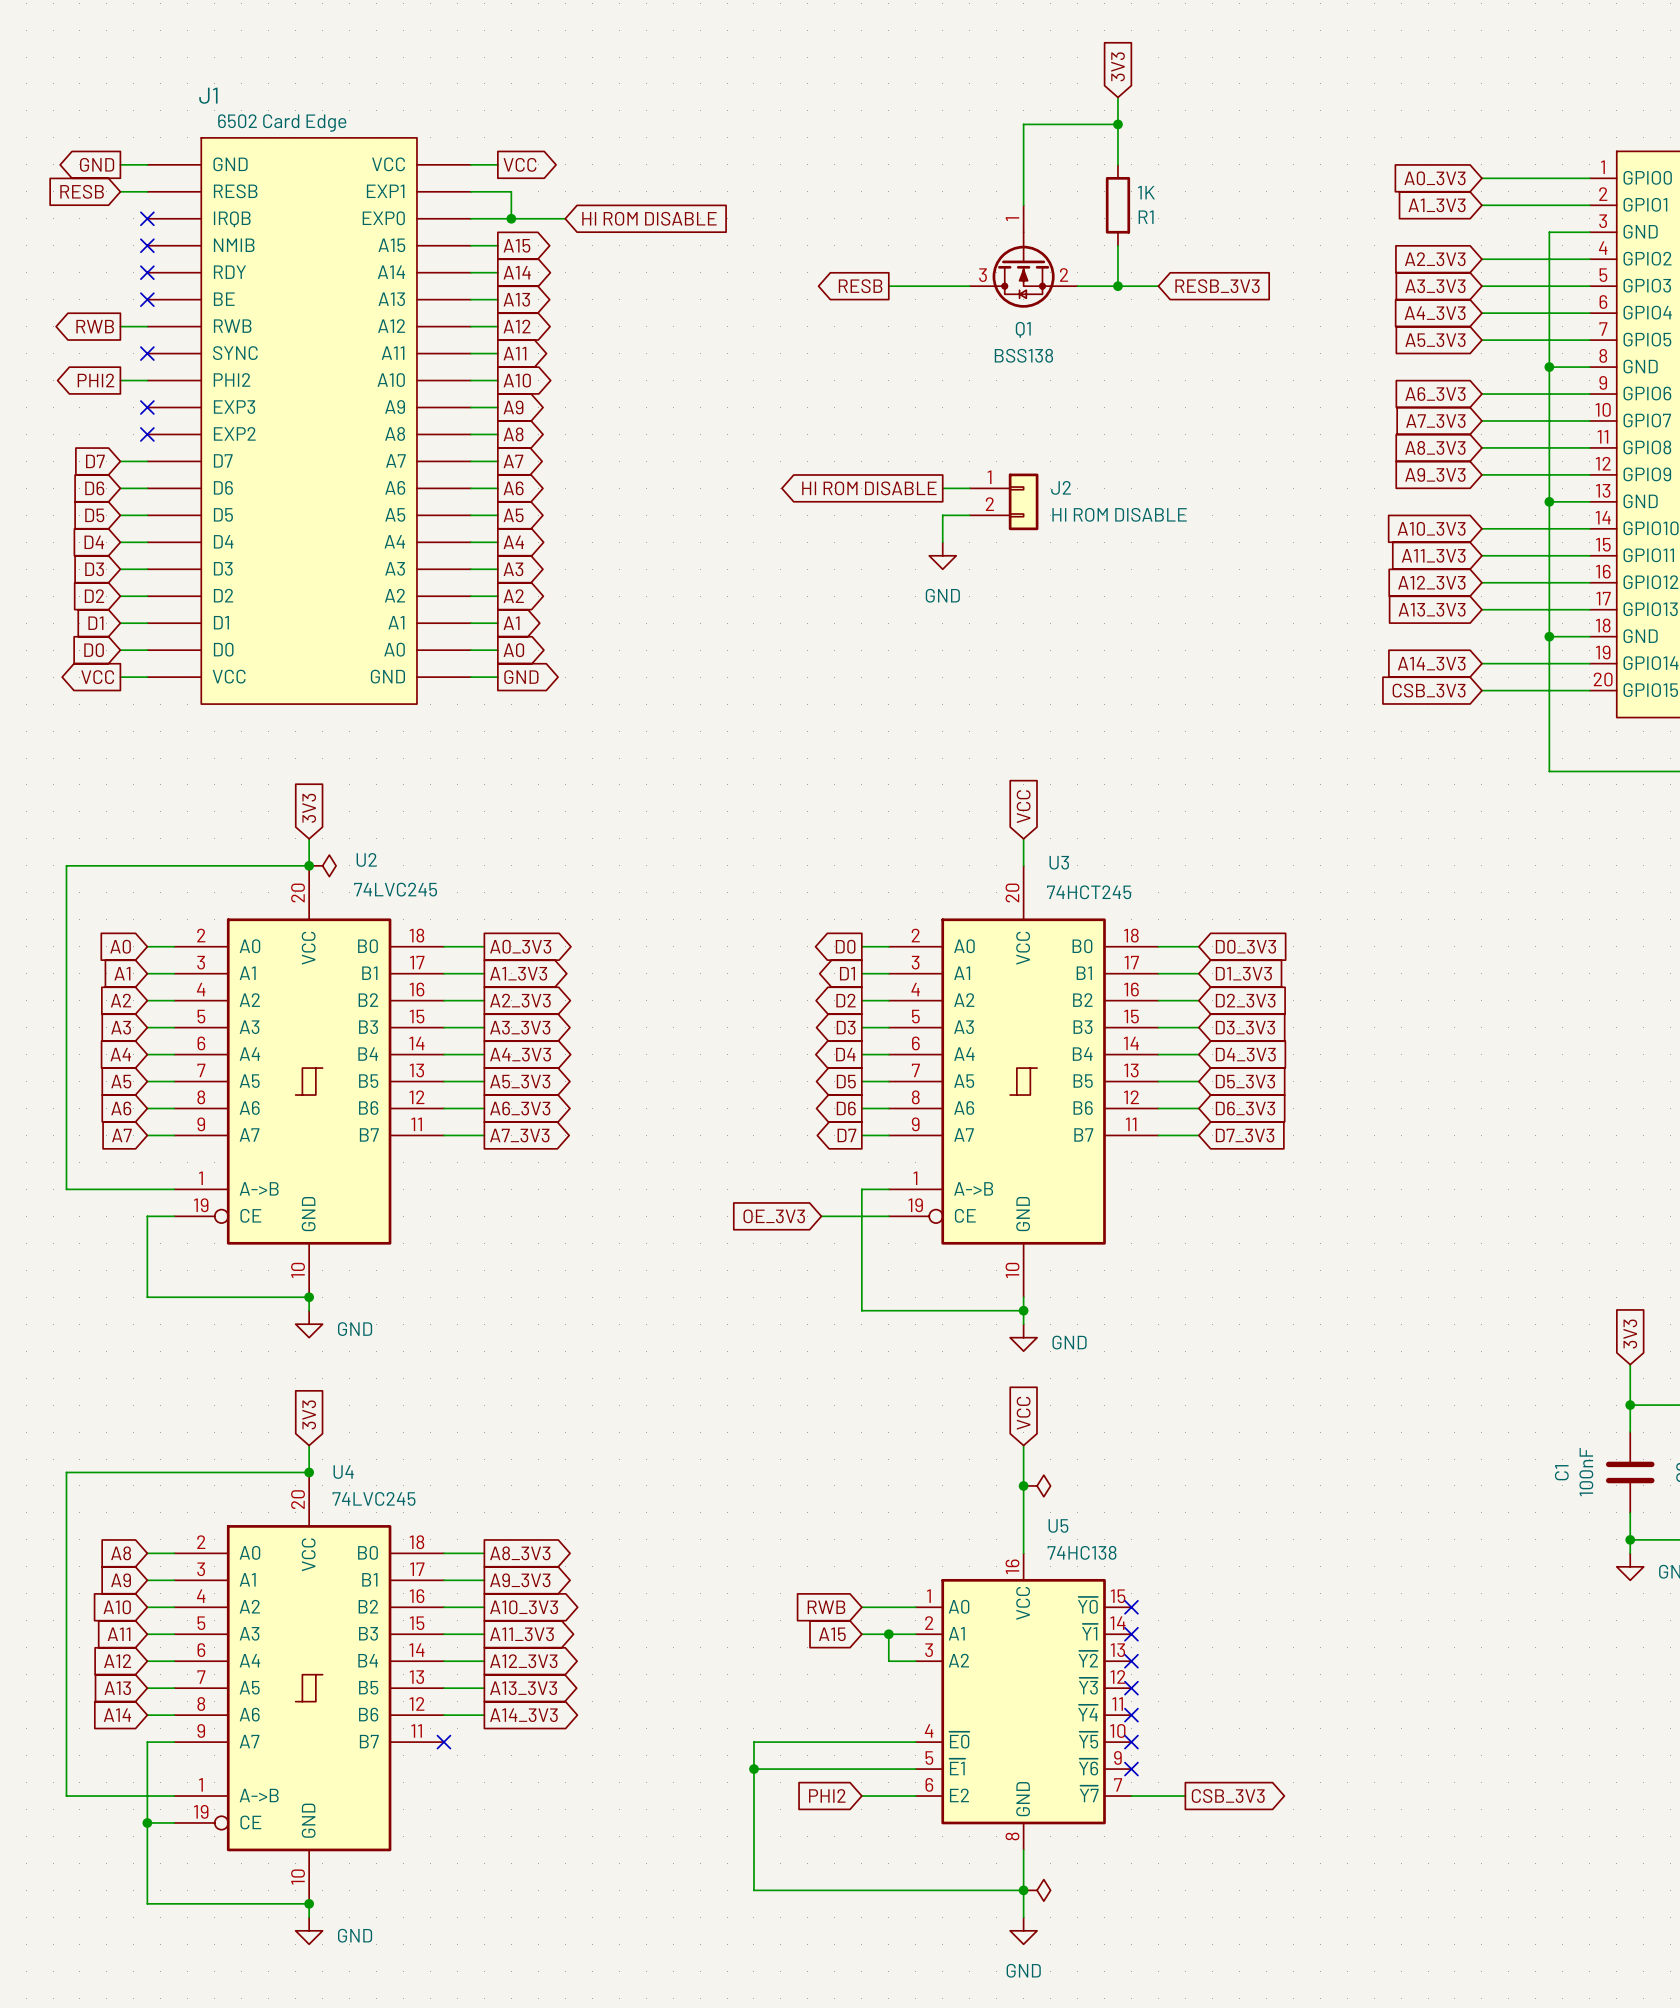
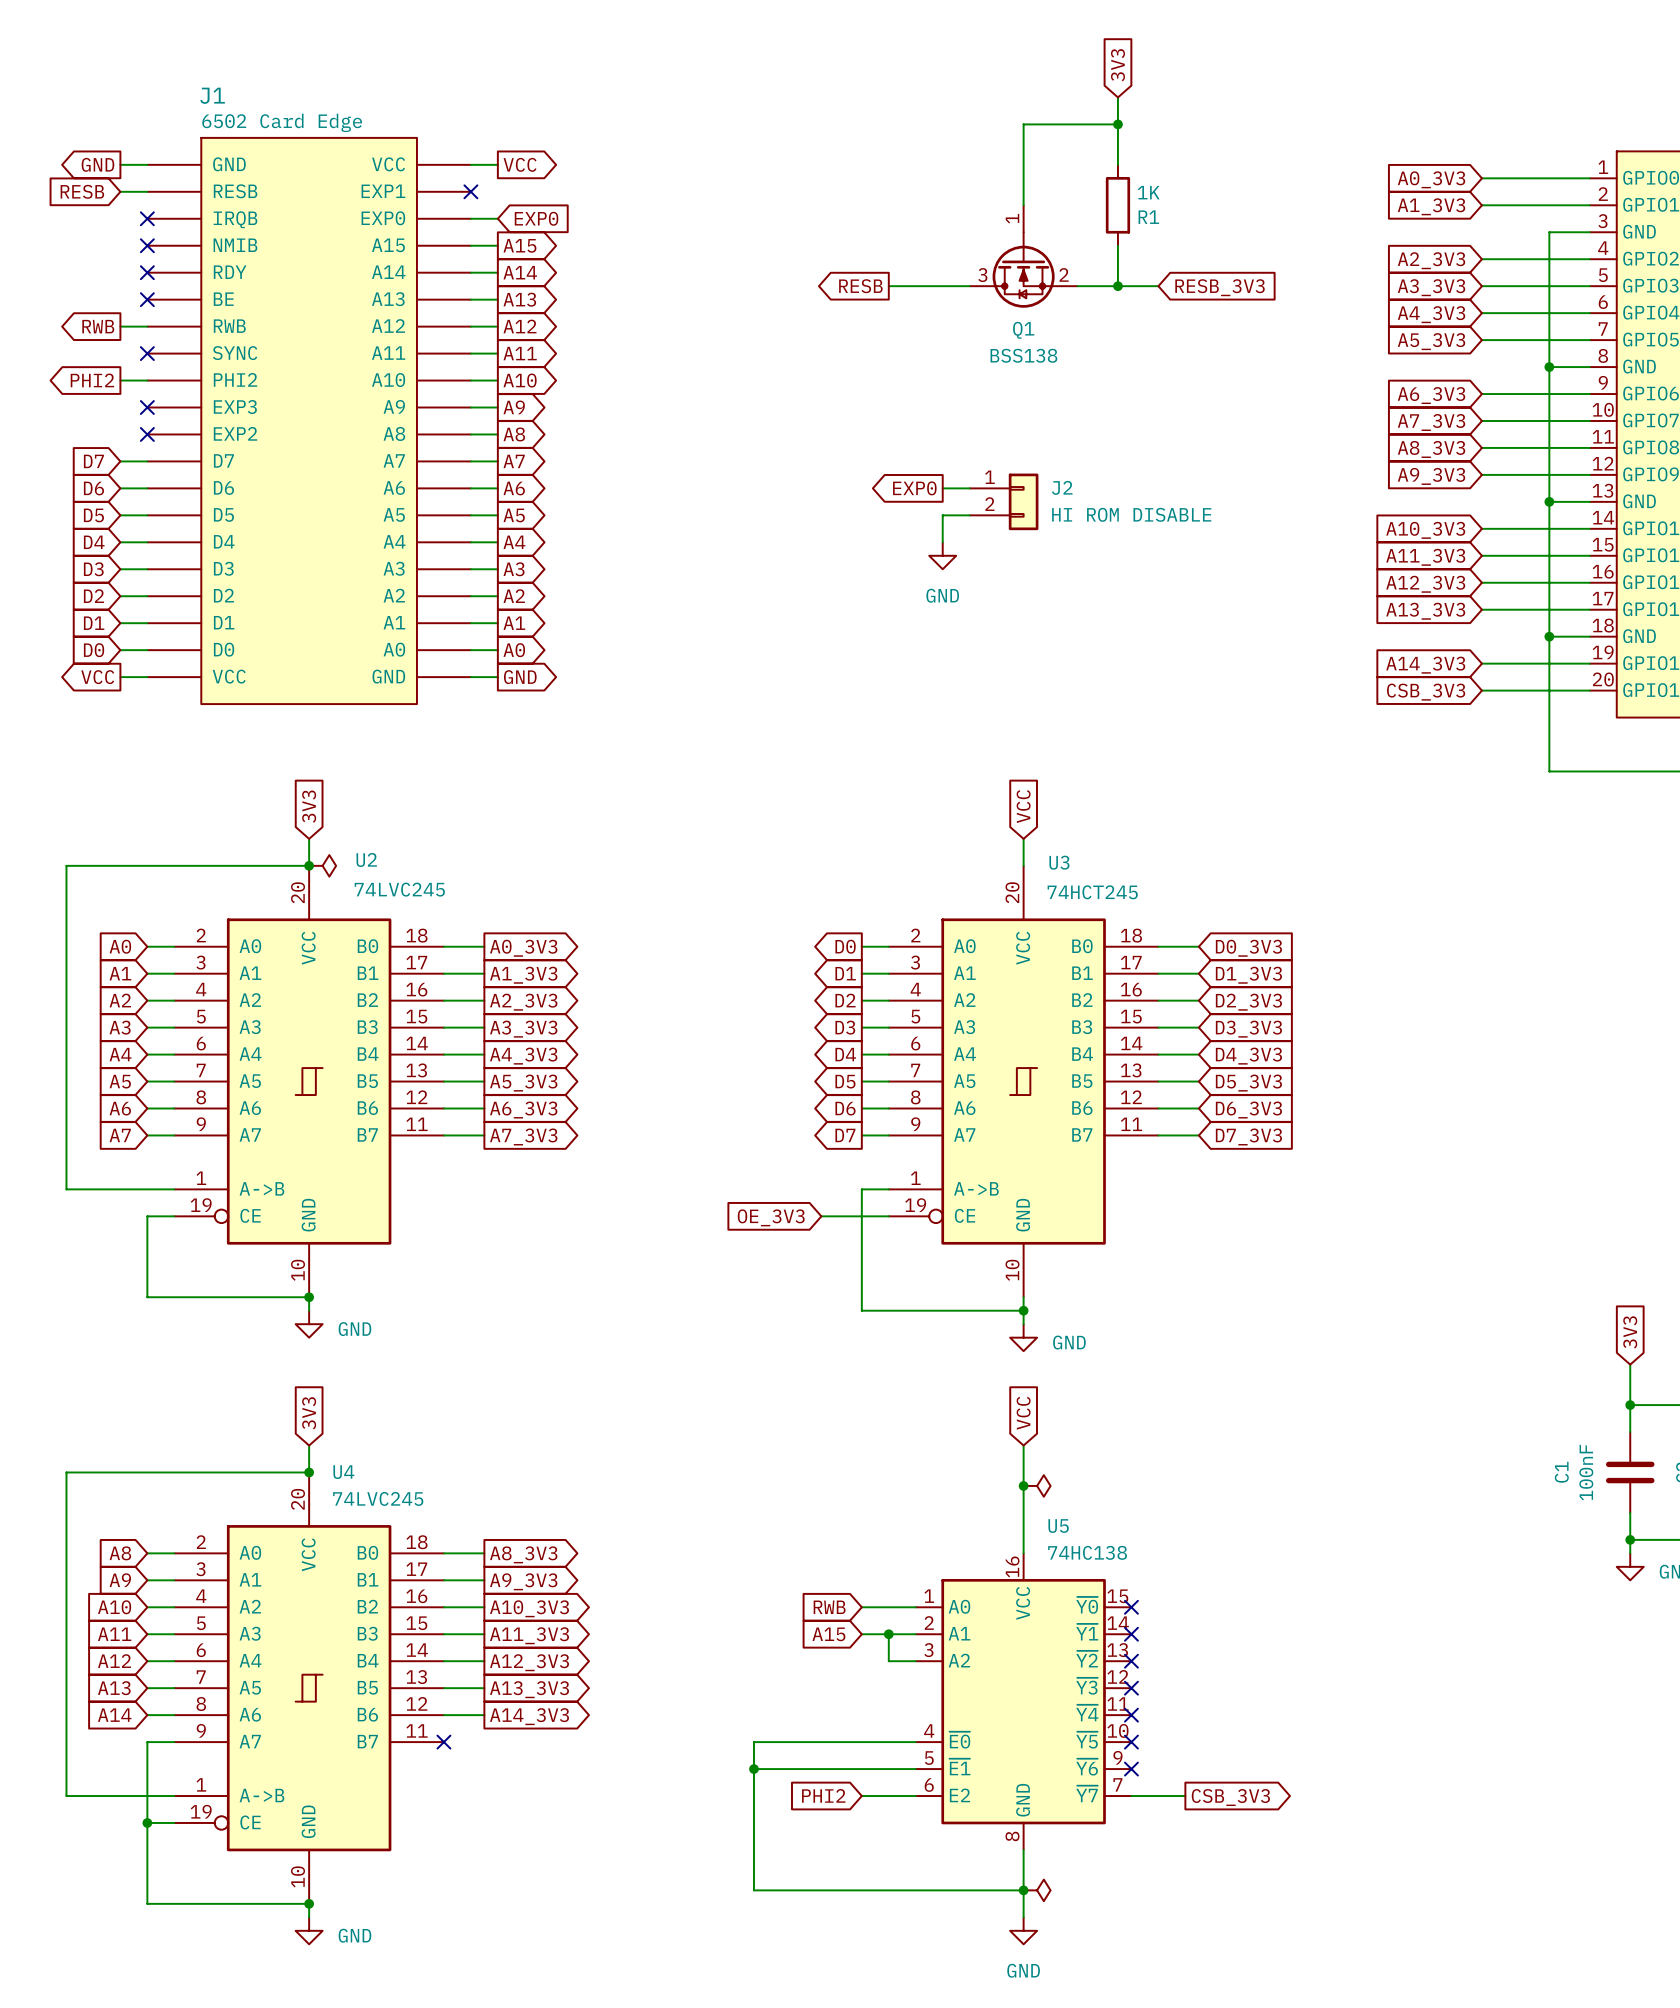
wire: (470, 191) (511, 191) (511, 218) -> none
no-connect mark: none -> (470, 191)
wire: (497, 218) (565, 218) -> none
junction: (511, 218) -> none
global label: none -> EXP0 (536, 218)
global label: HI ROM DISABLE (649, 218) -> none
global label: HI ROM DISABLE (869, 488) -> EXP0 (914, 488)

